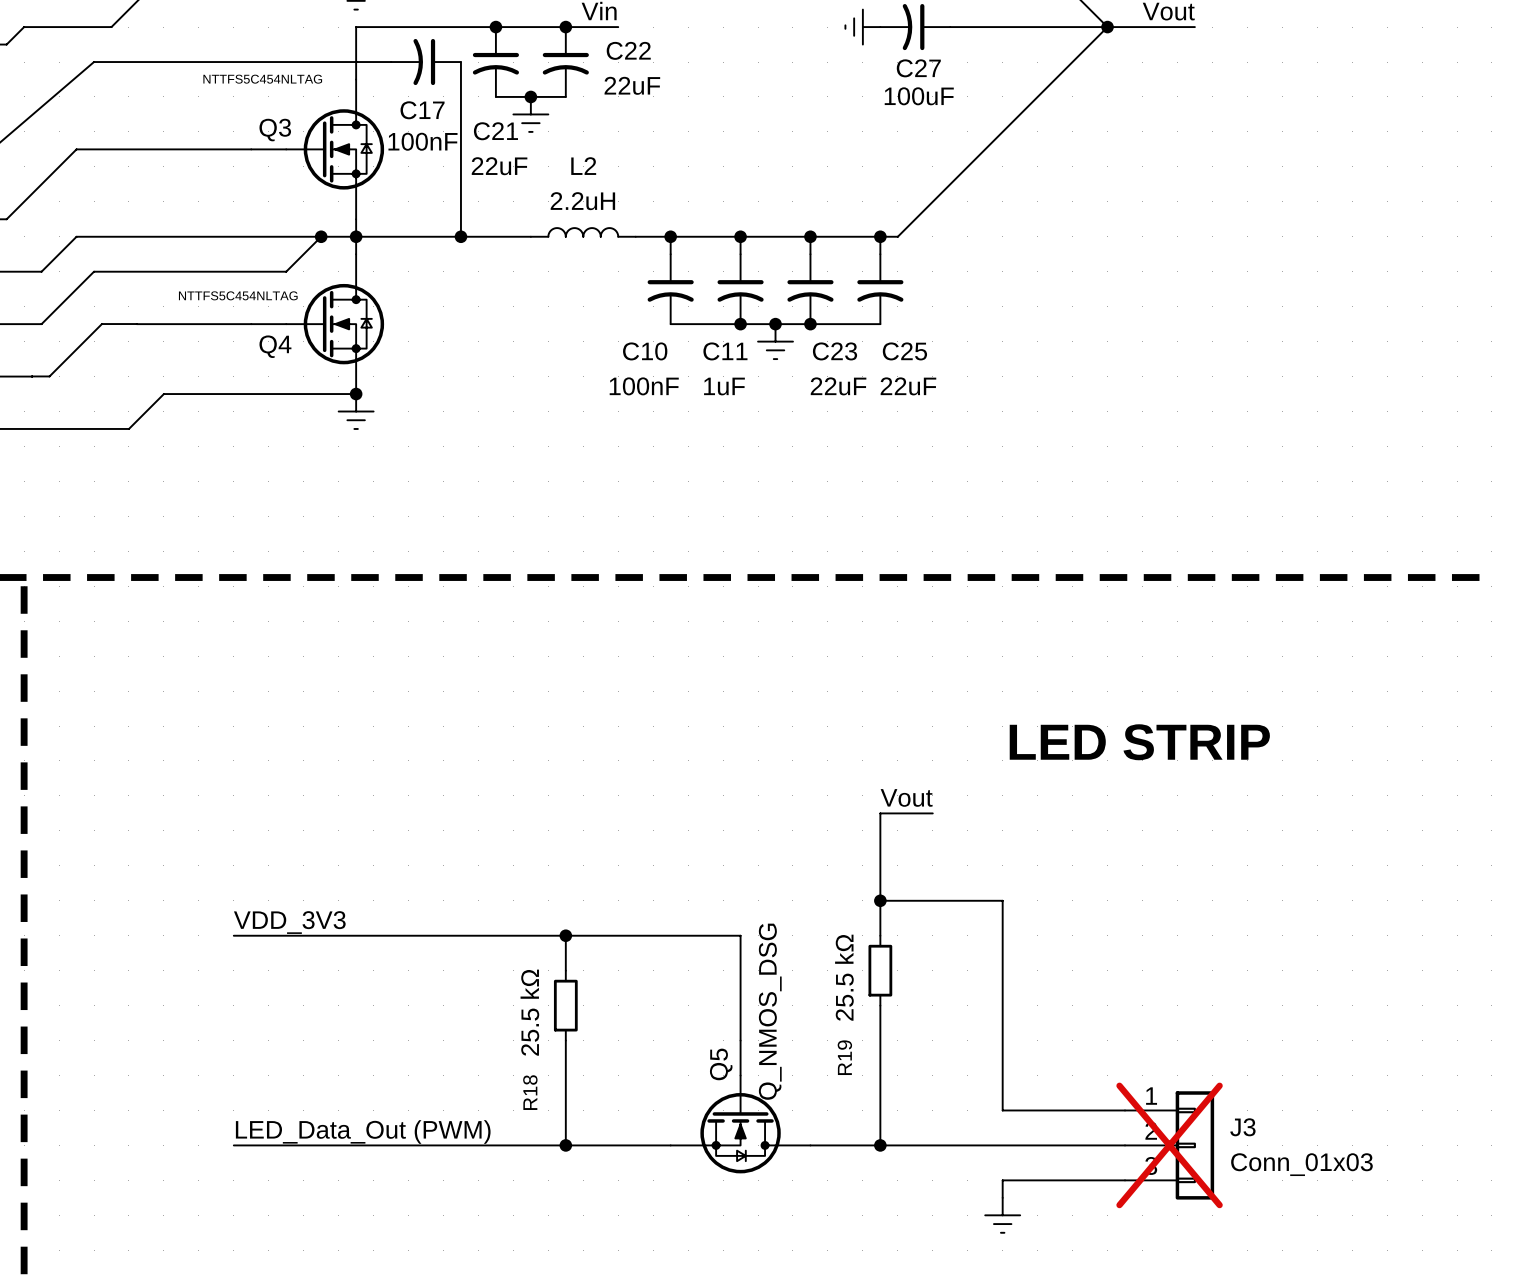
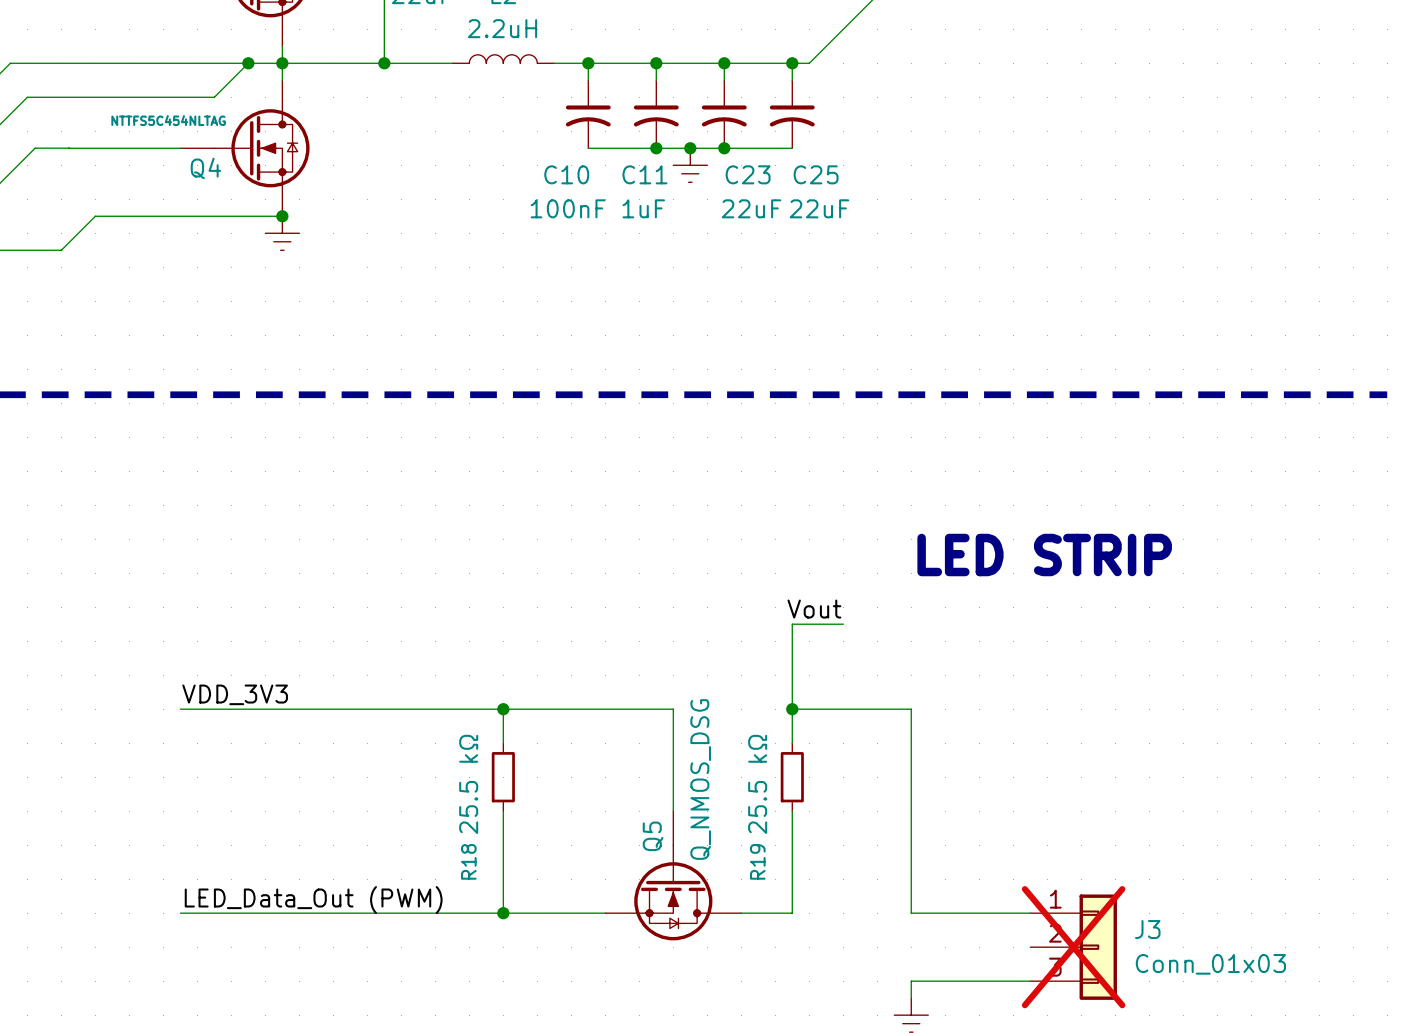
label position: VDD_3V3 (289, 922) -> VDD_3V3 (235, 694)
wire: (233, 935) (740, 935) (740, 1040) -> (180, 709) (673, 709) (673, 811)
wire: (565, 935) (565, 970) -> (503, 709) (503, 743)
junction position: (565, 935) -> (503, 709)
R18 position: (565, 1005) -> (503, 777)
wire: (565, 1040) (565, 1145) -> (503, 811) (503, 913)
Q5 position: (740, 1106) -> (673, 875)
wire: (880, 1110) (880, 1145) -> (792, 913) (741, 913)
label position: LED_Data_Out (PWM) (363, 1131) -> LED_Data_Out (PWM) (313, 900)
wire: (233, 1145) (670, 1145) -> (180, 913) (605, 913)
junction position: (565, 1145) -> (503, 913)
wire: (810, 1145) (1125, 1145) -> none
junction: (880, 1145) -> none

